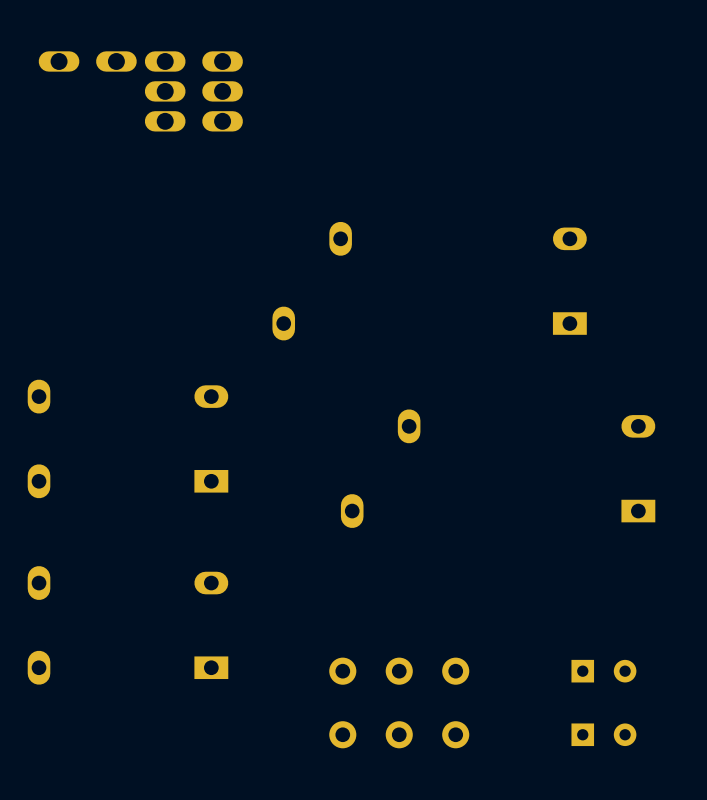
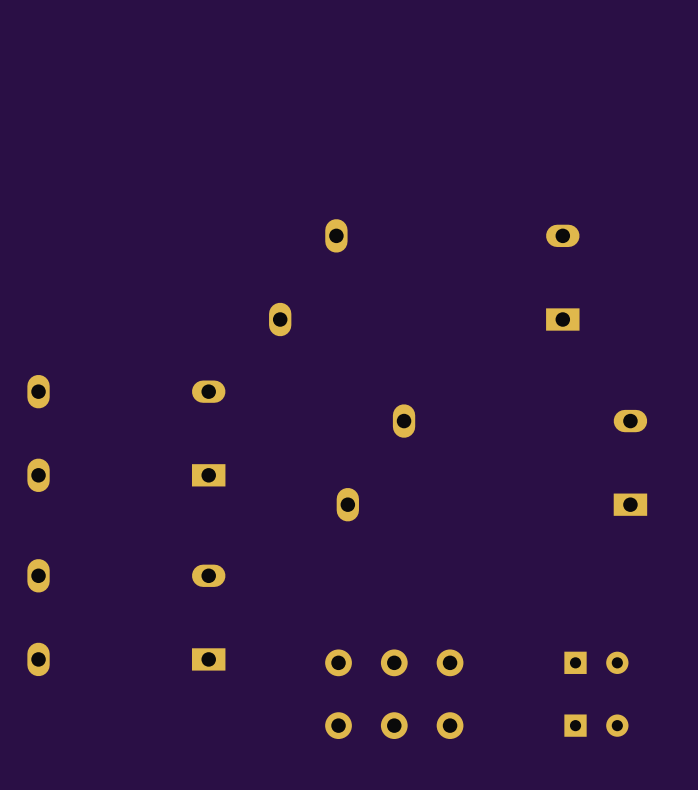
part: (87, 61) -> none
part: (193, 61) -> none
part: (193, 91) -> none
part: (193, 121) -> none

